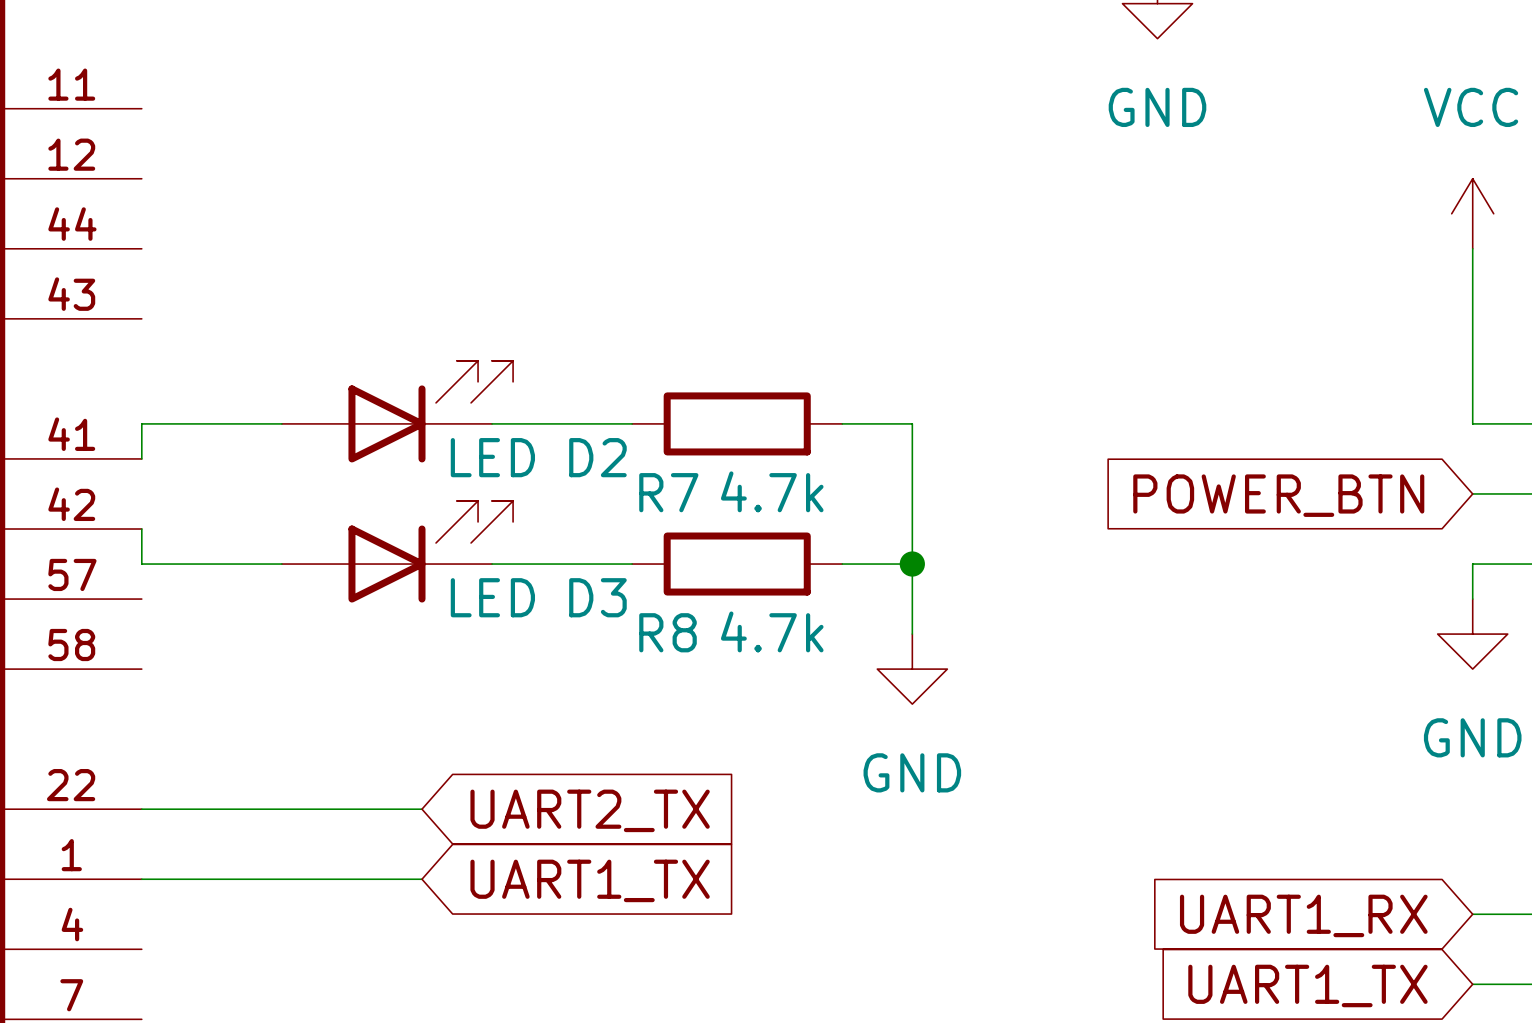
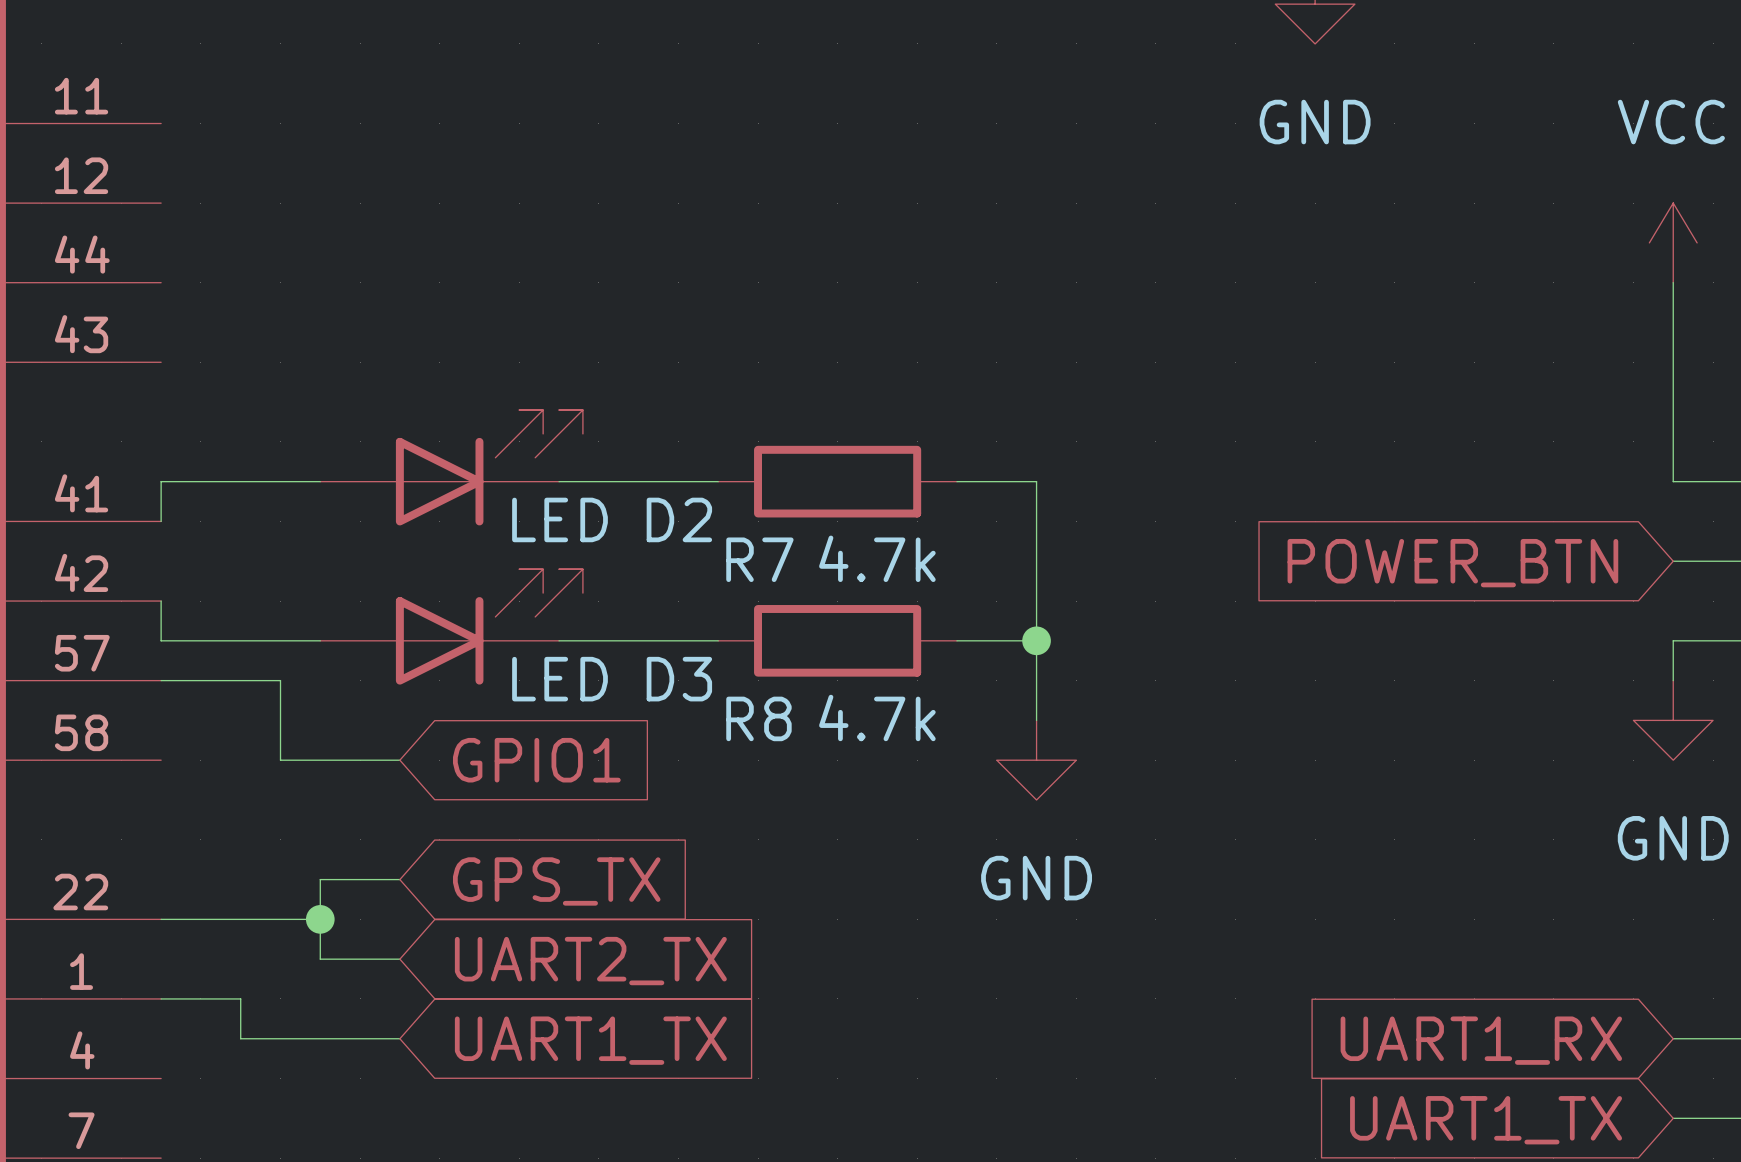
wire: none -> (161, 680) (280, 680) (280, 760) (399, 760)
global label: none -> GPIO1 (536, 760)
wire: none -> (399, 879) (320, 879) (320, 959) (399, 959)
global label: none -> GPS_TX (556, 881)
wire: (281, 809) (422, 809) -> none
junction: none -> (320, 919)
global label position: UART2_TX (590, 810) -> UART2_TX (590, 961)
wire: (211, 879) (422, 879) -> (240, 998) (240, 1038) (399, 1038)
global label position: UART1_TX (590, 880) -> UART1_TX (590, 1040)

